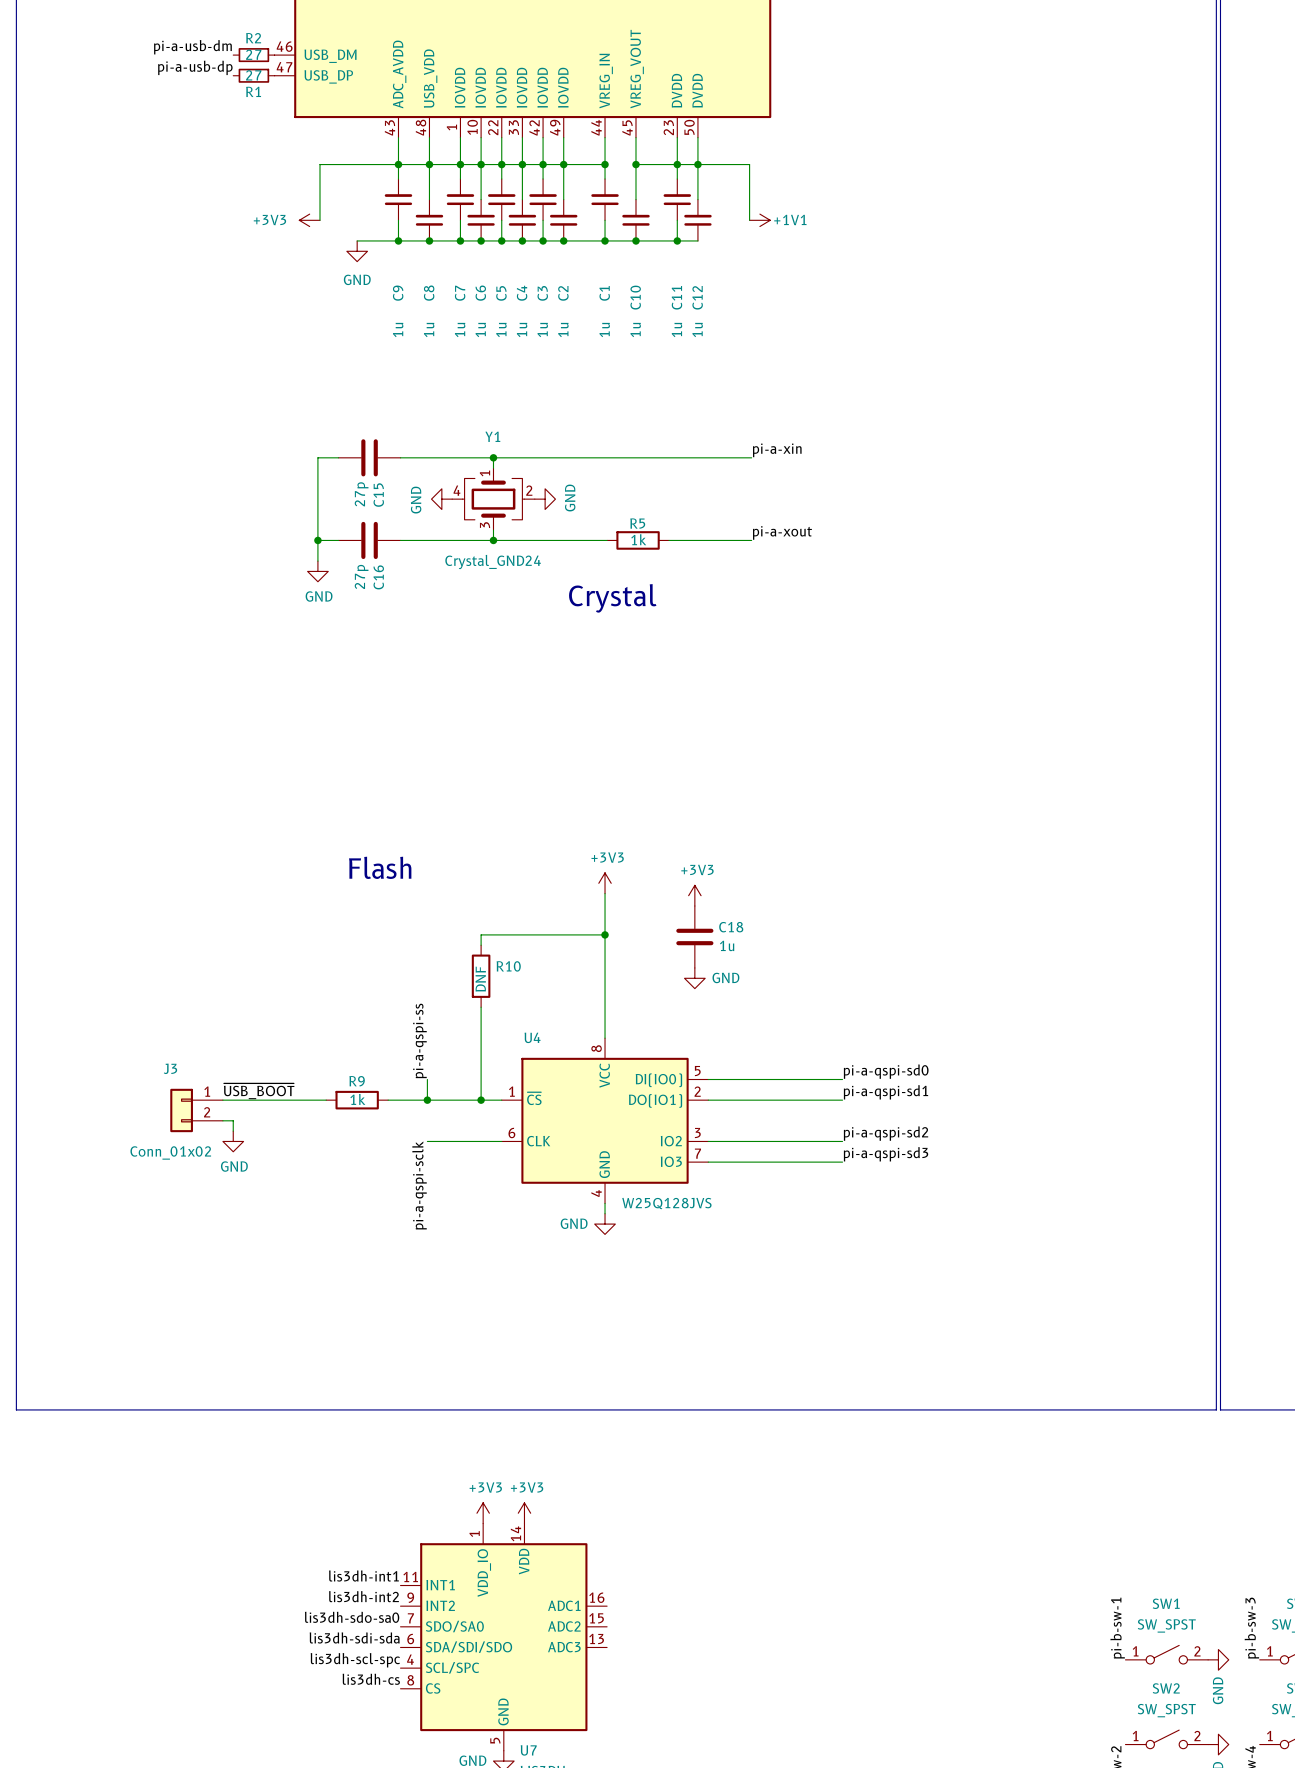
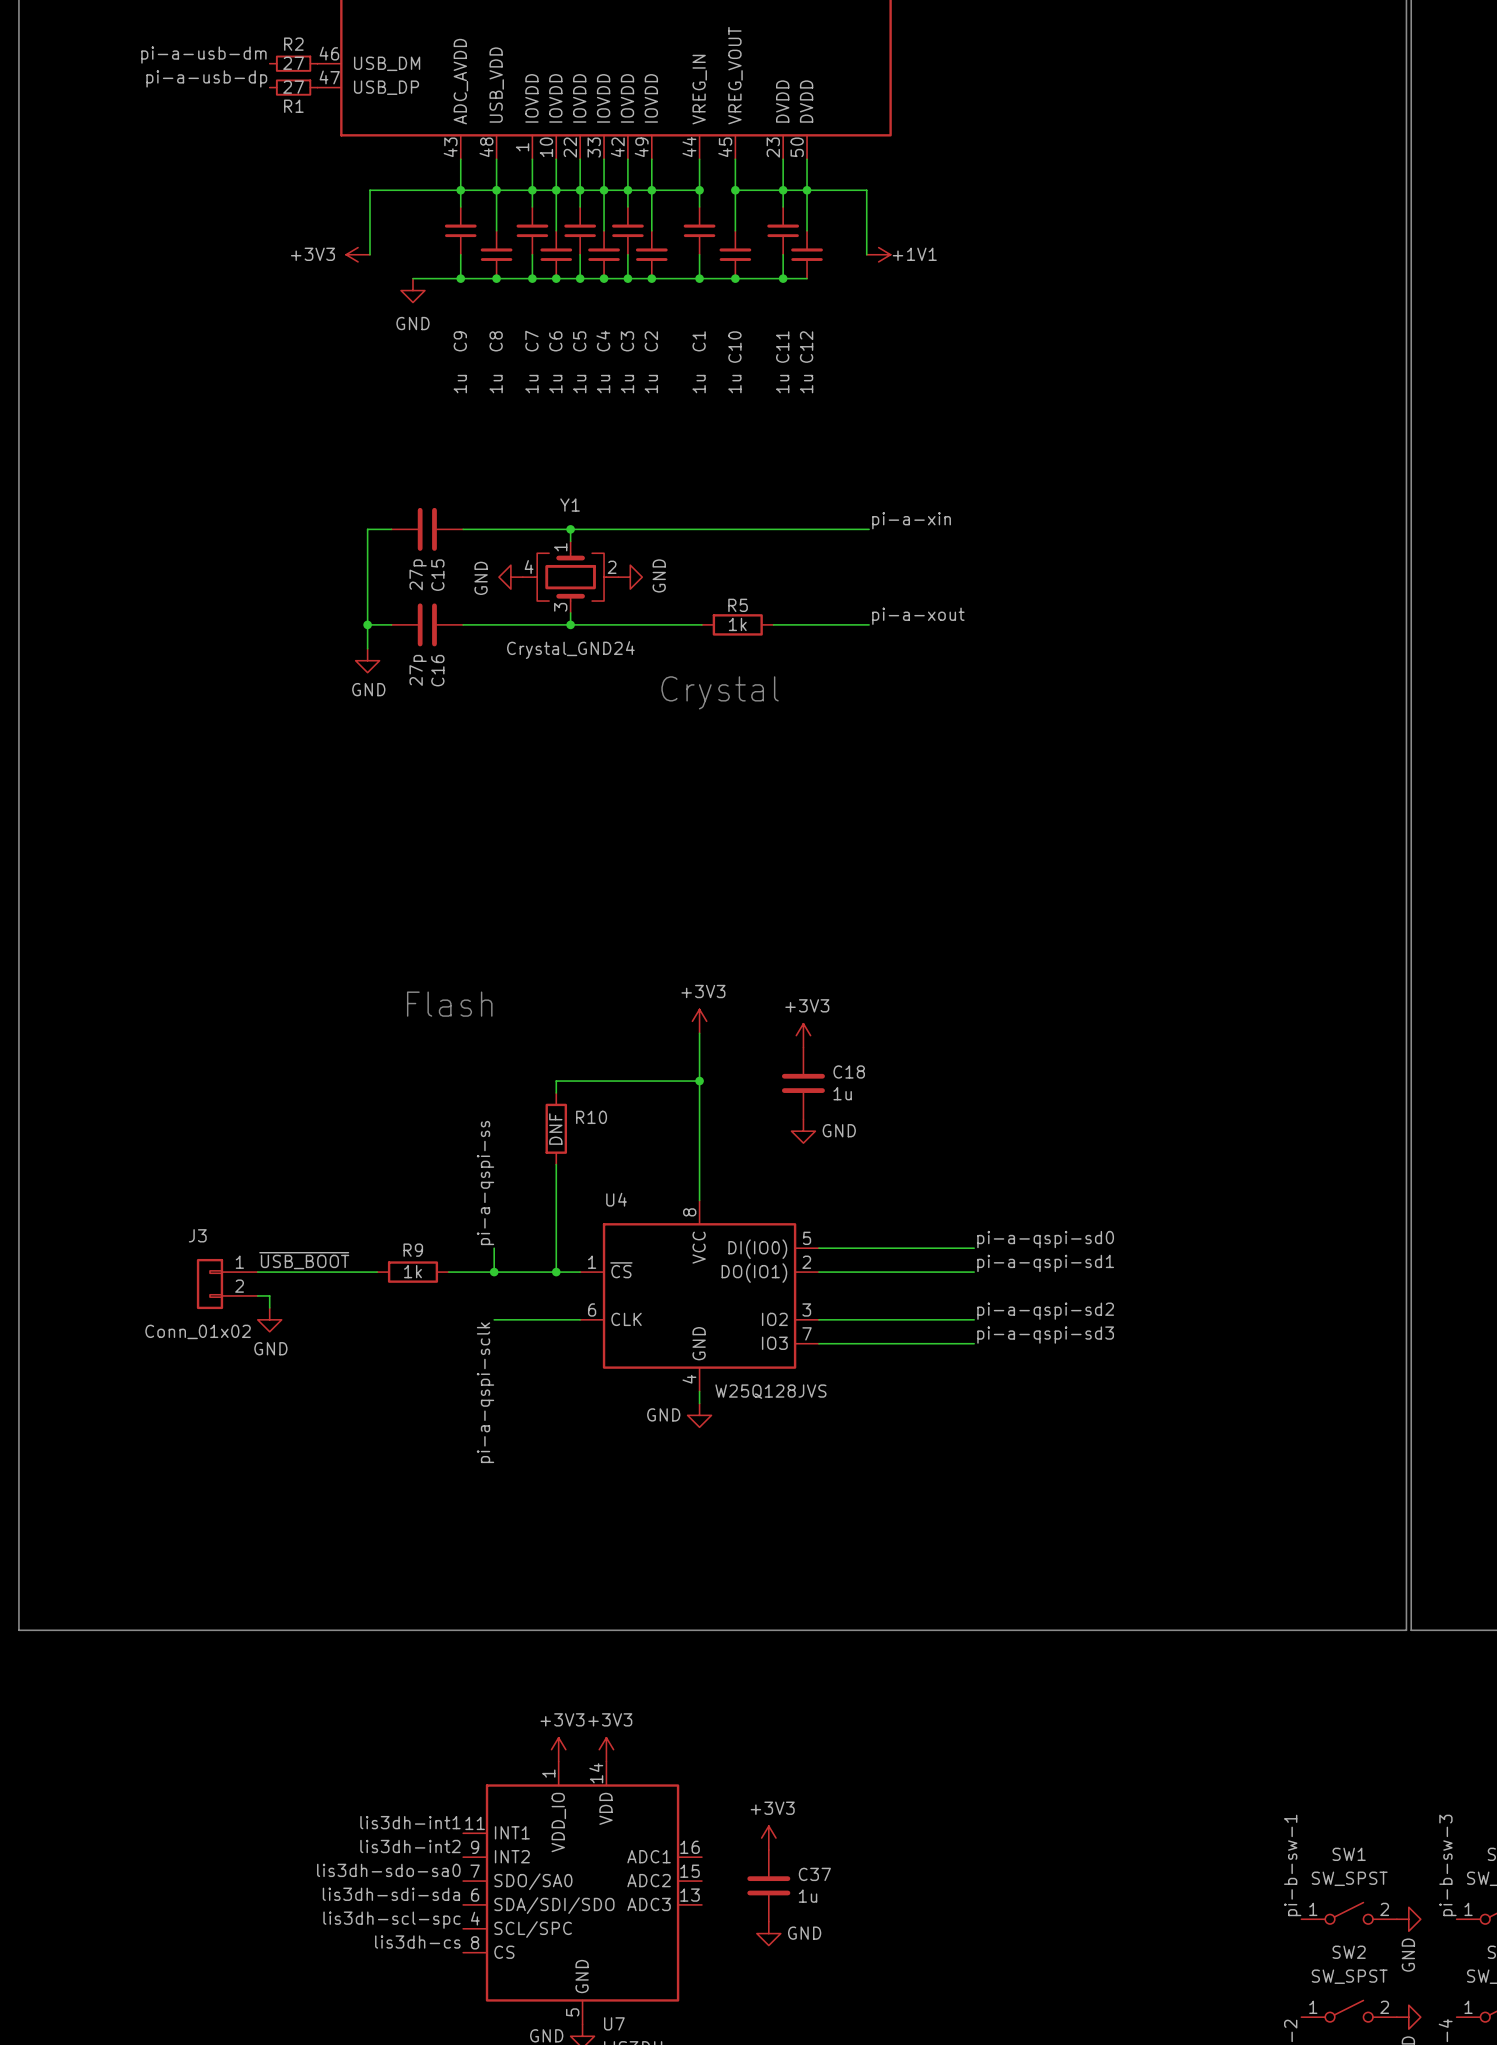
power symbol: none -> +3V3 (768, 1838)
C37: none -> 1u (768, 1885)
power symbol: none -> GND (768, 1933)

